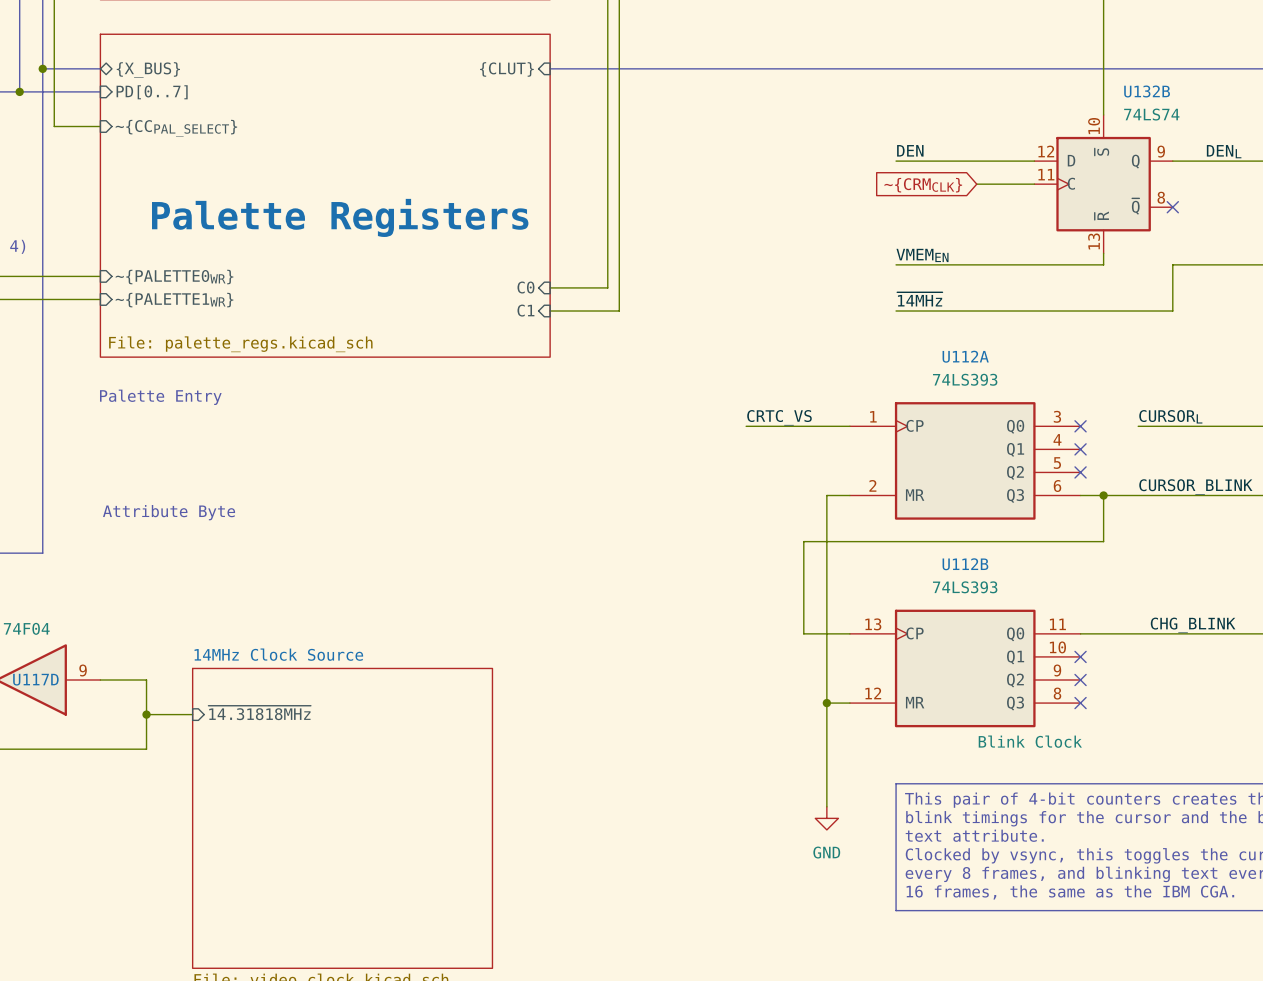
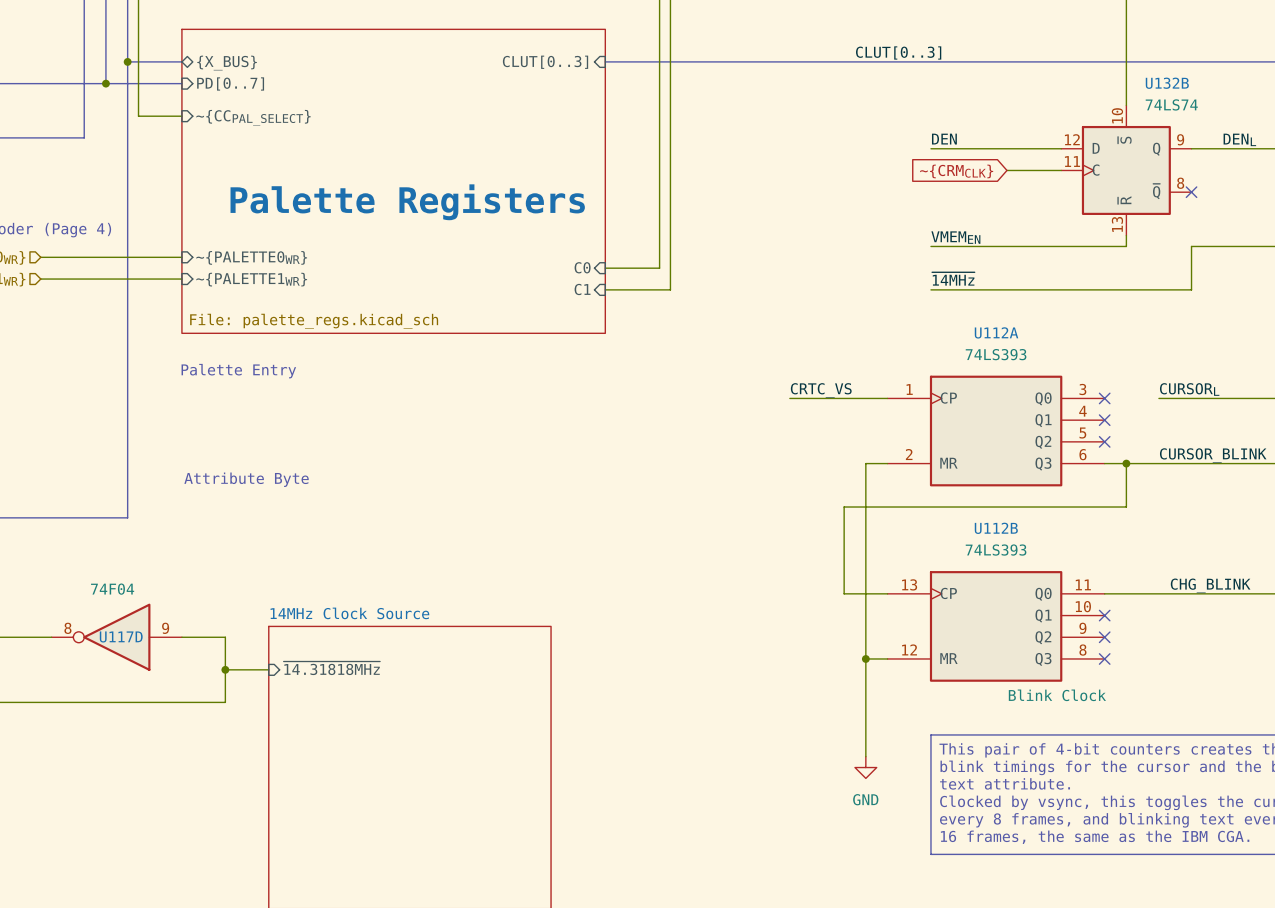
label: none -> CLUT[0..3] (898, 52)
sheet pin: {CLUT} (506, 69) -> CLUT[0..3] (545, 62)

